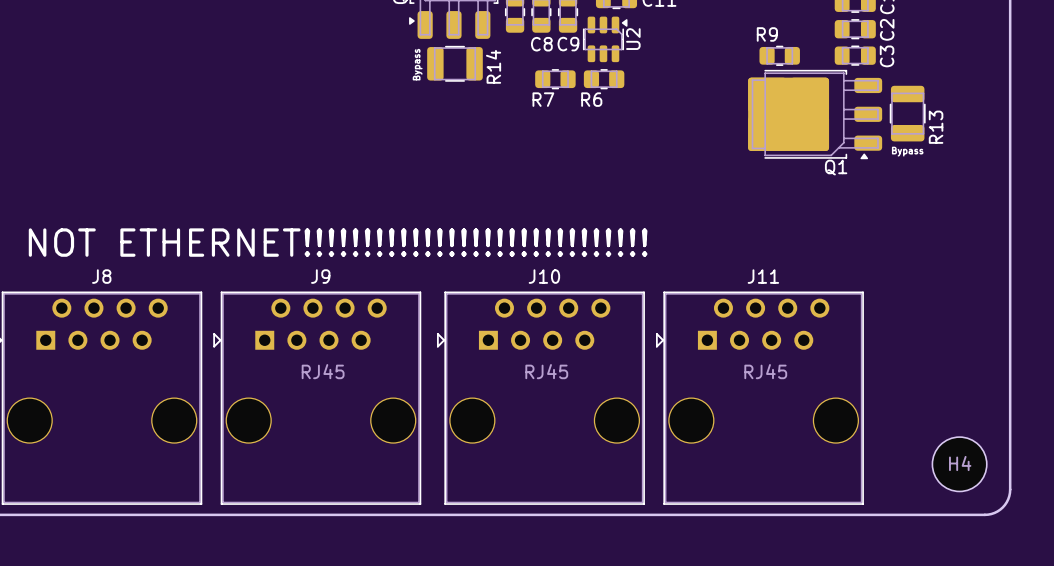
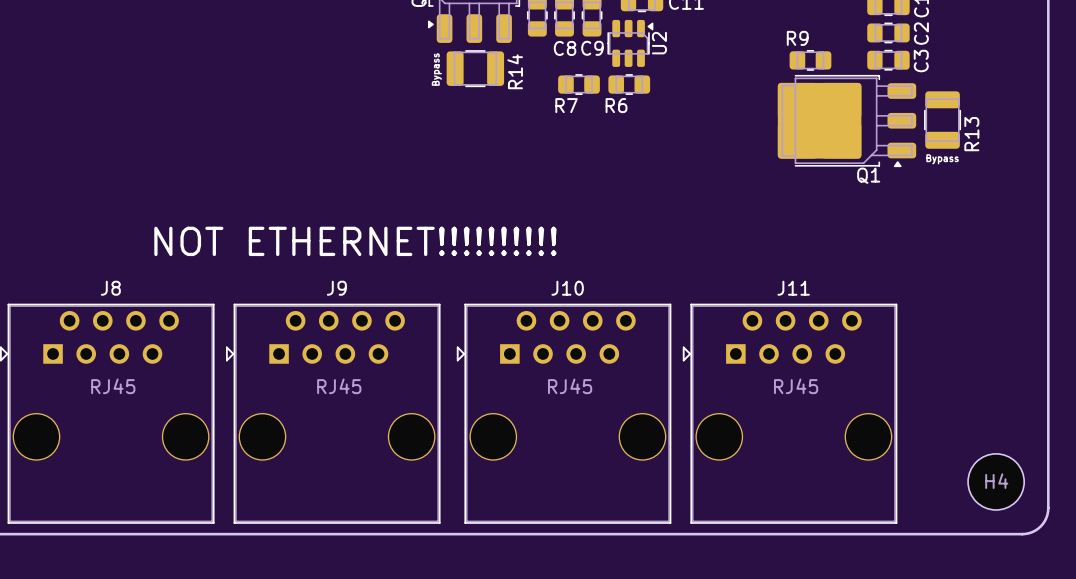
text: NOT ETHERNET!!!!!!!!!!!!!!!!!!!!!!!!!!!!! (338, 242) -> NOT ETHERNET!!!!!!!!!! (355, 241)
J8 value: none -> RJ45 (113, 386)

